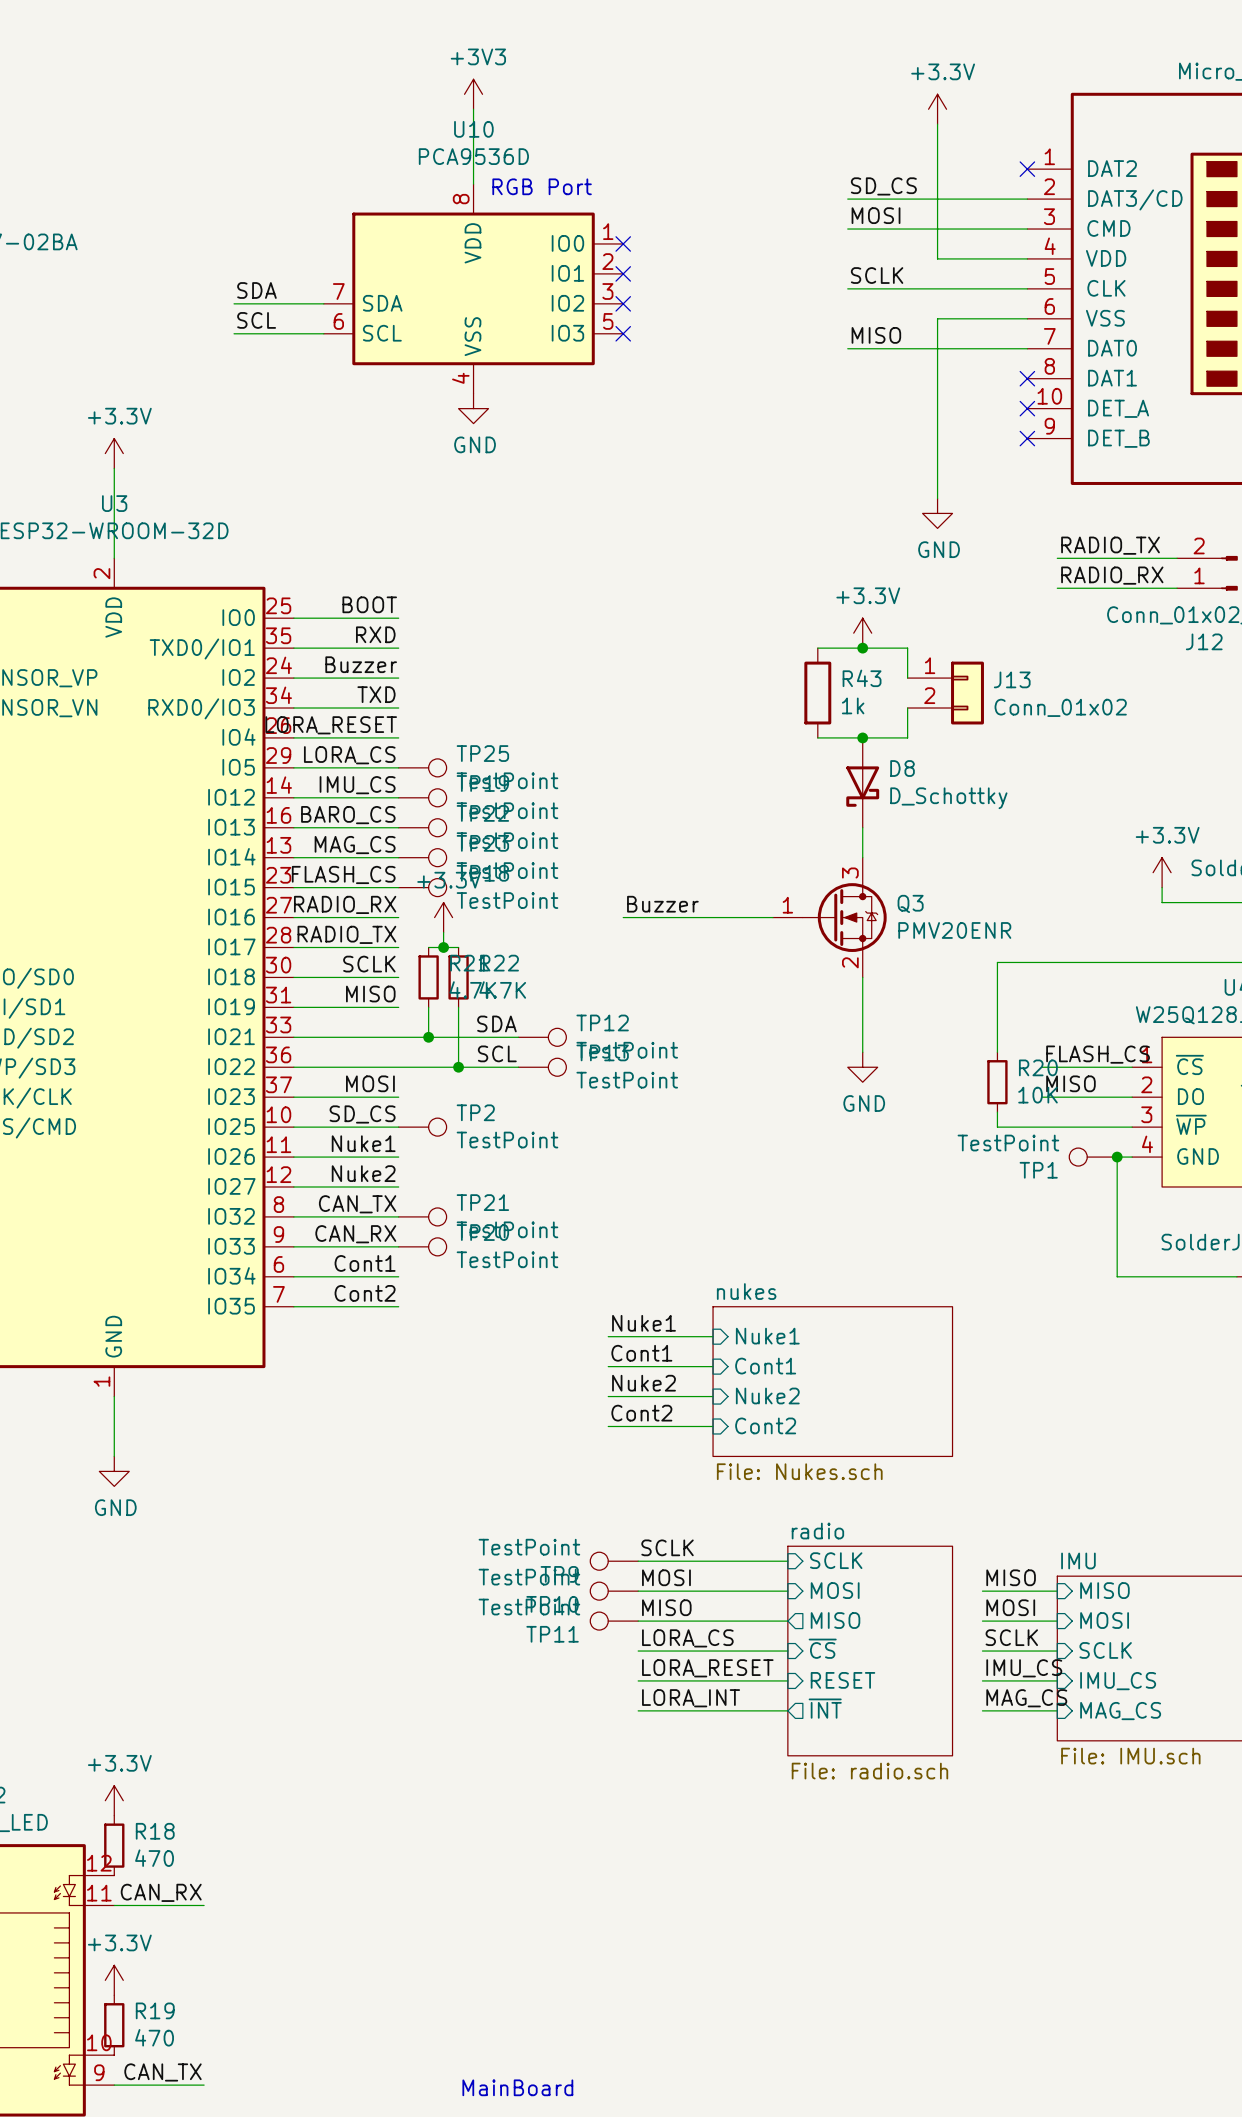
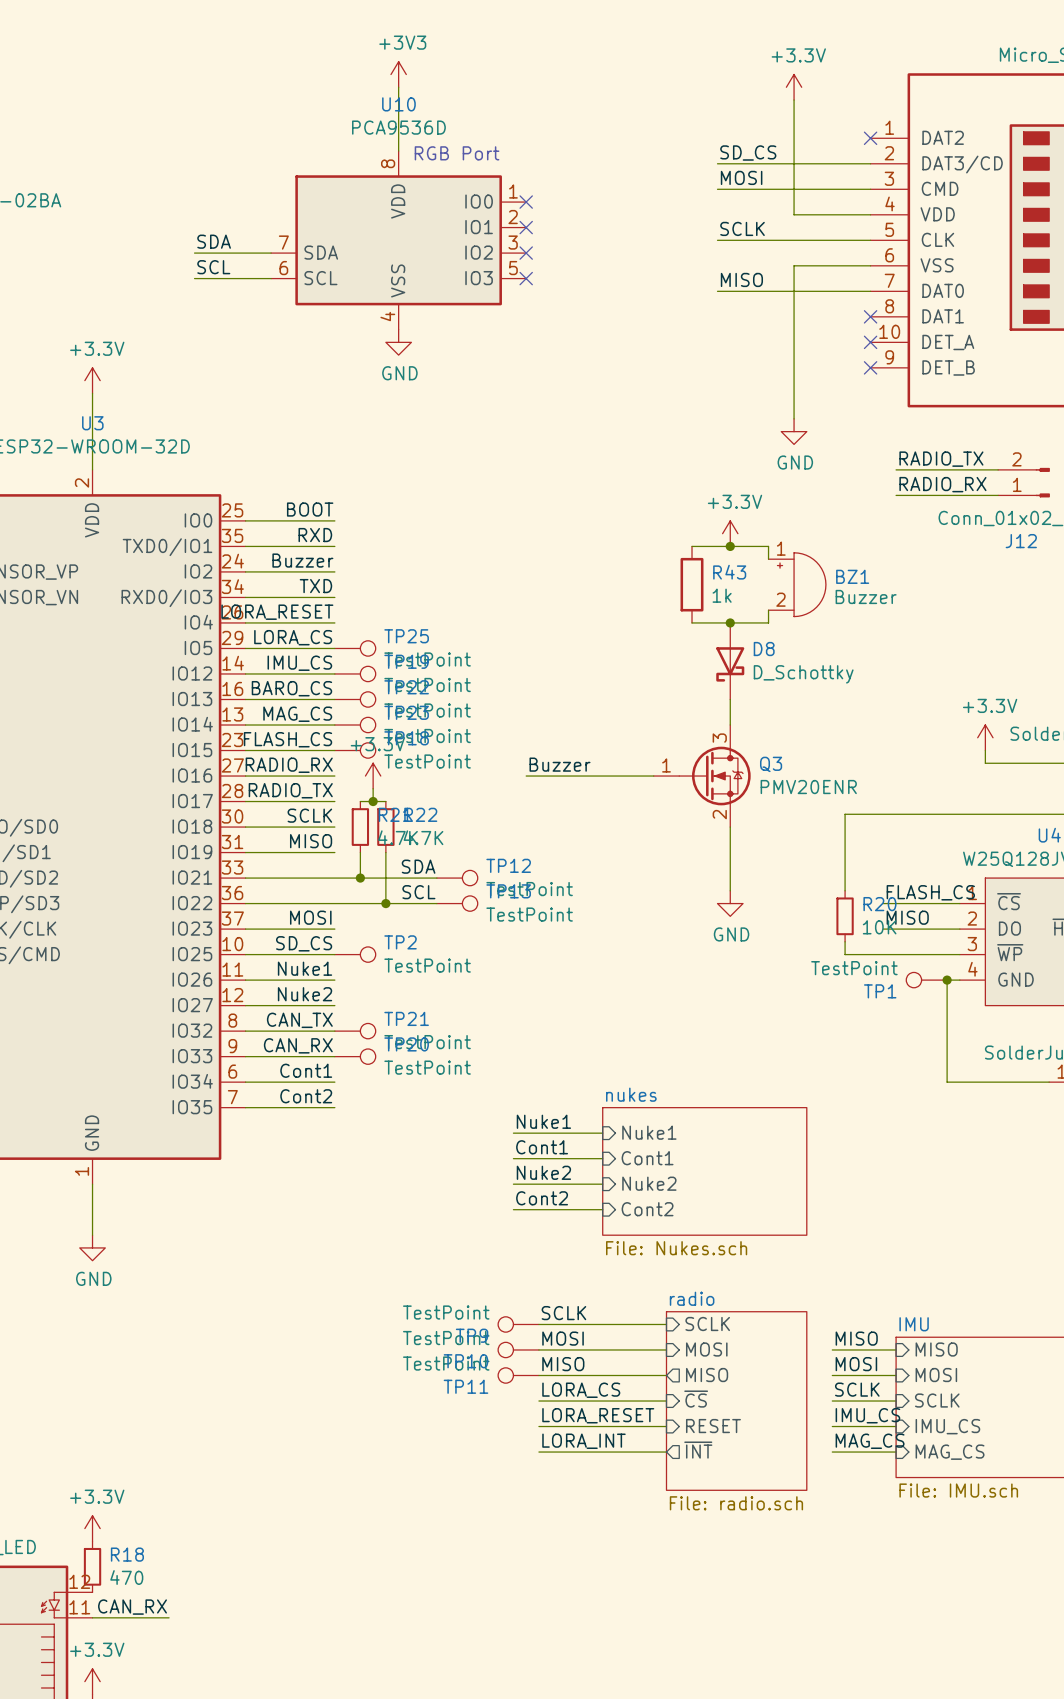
wire: (907, 663) (907, 678) -> none
BZ1: none -> Buzzer (797, 584)
J13: Conn_01x02 (945, 693) -> none
wire: (907, 708) (907, 722) -> none

